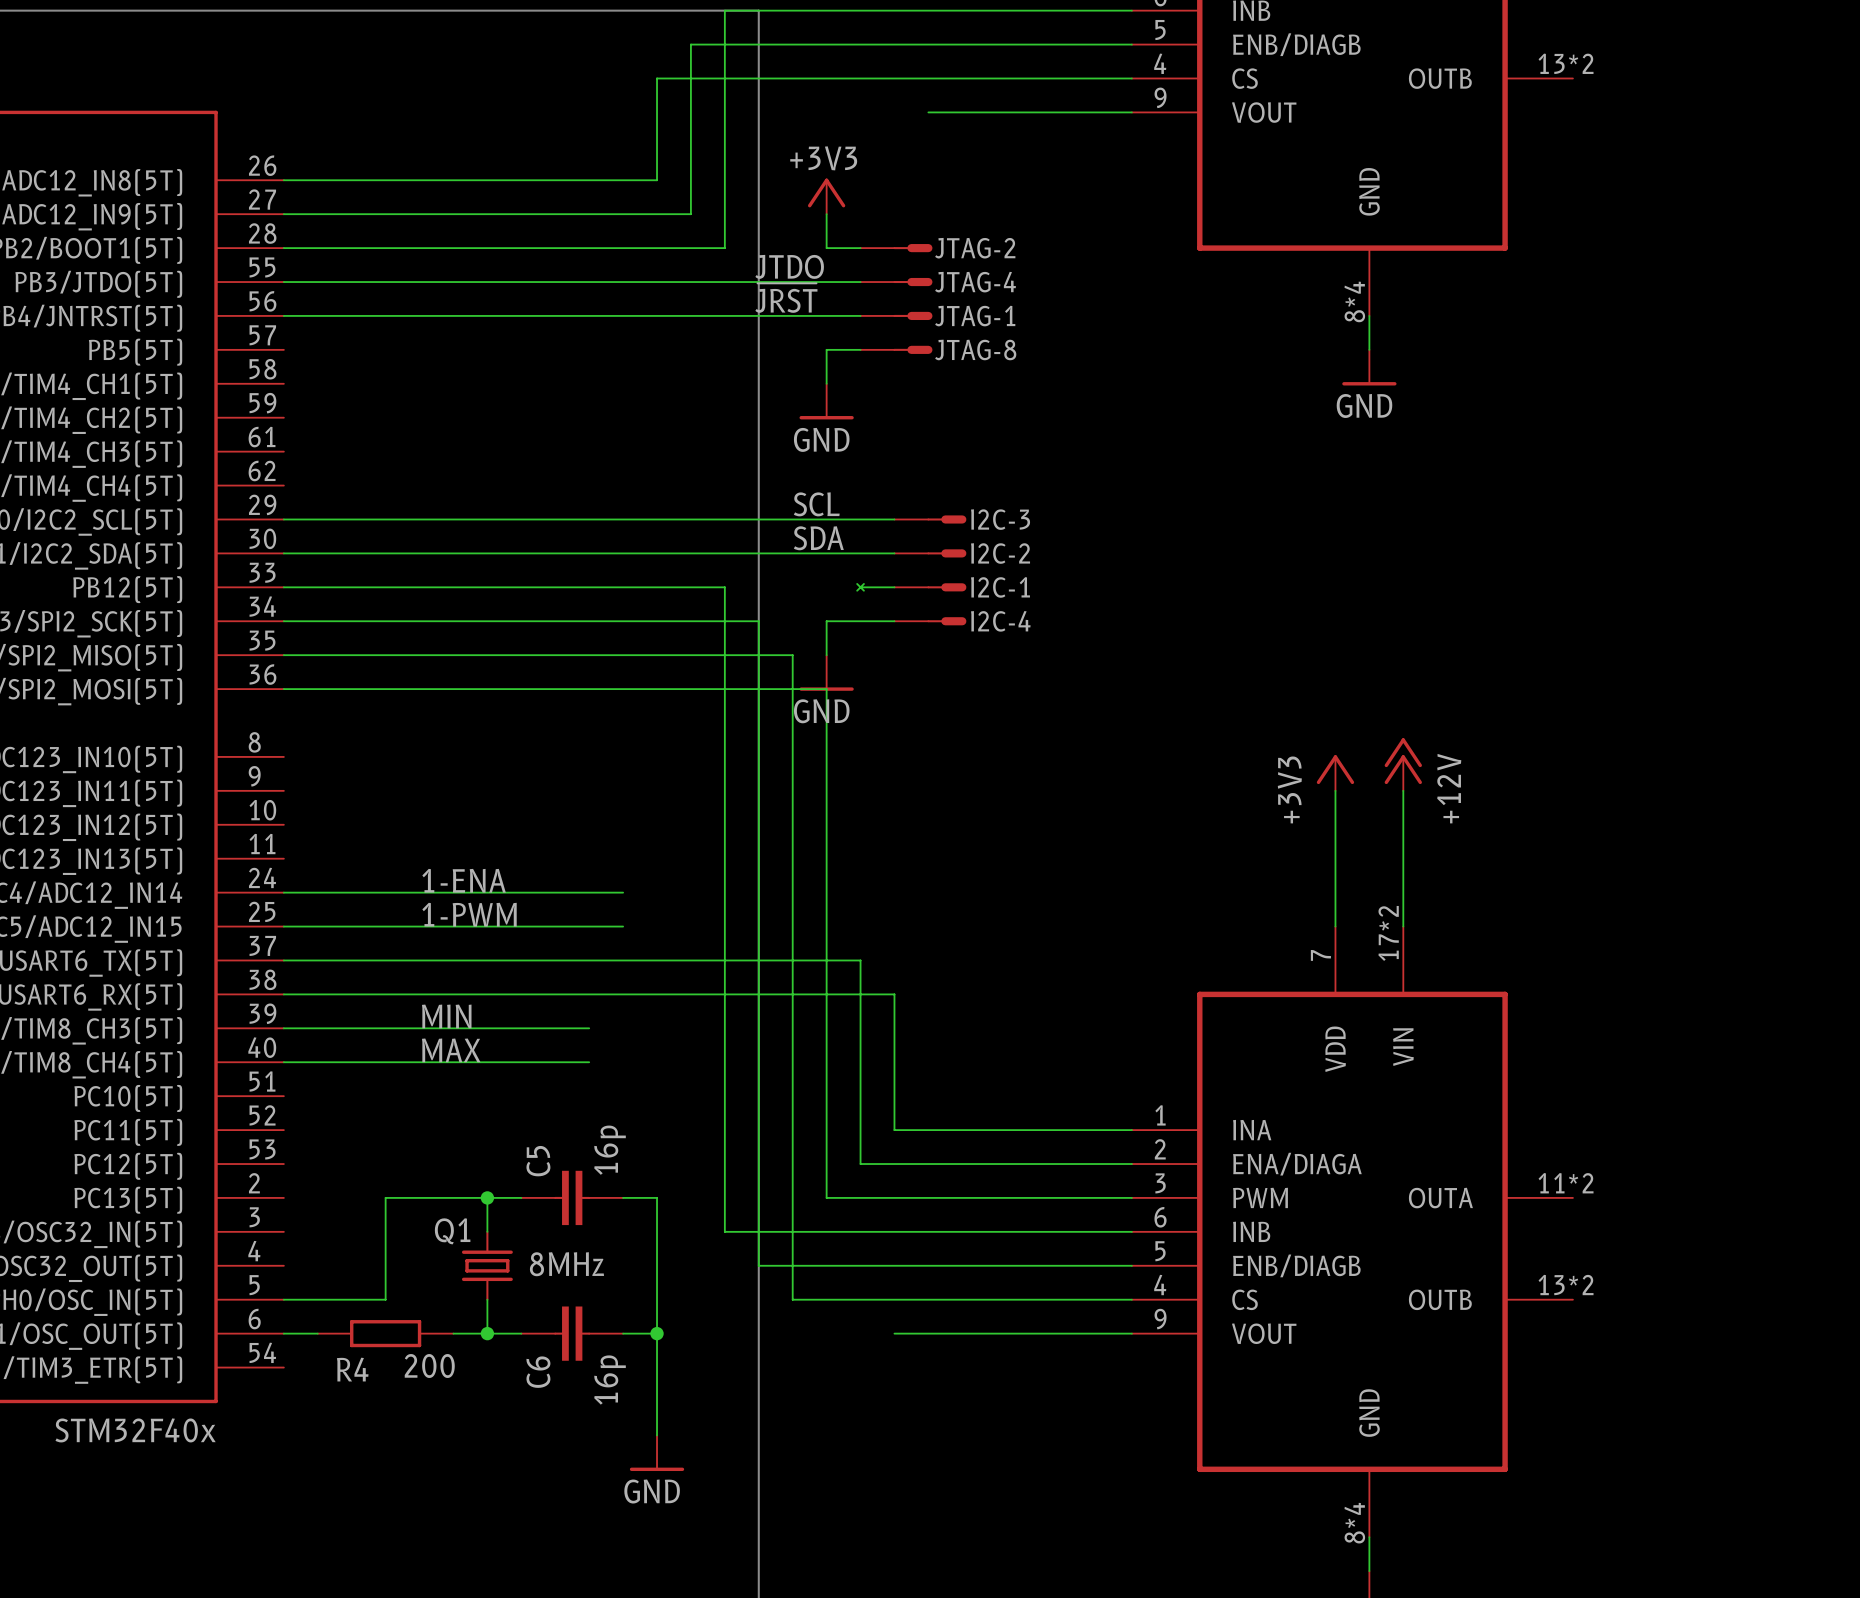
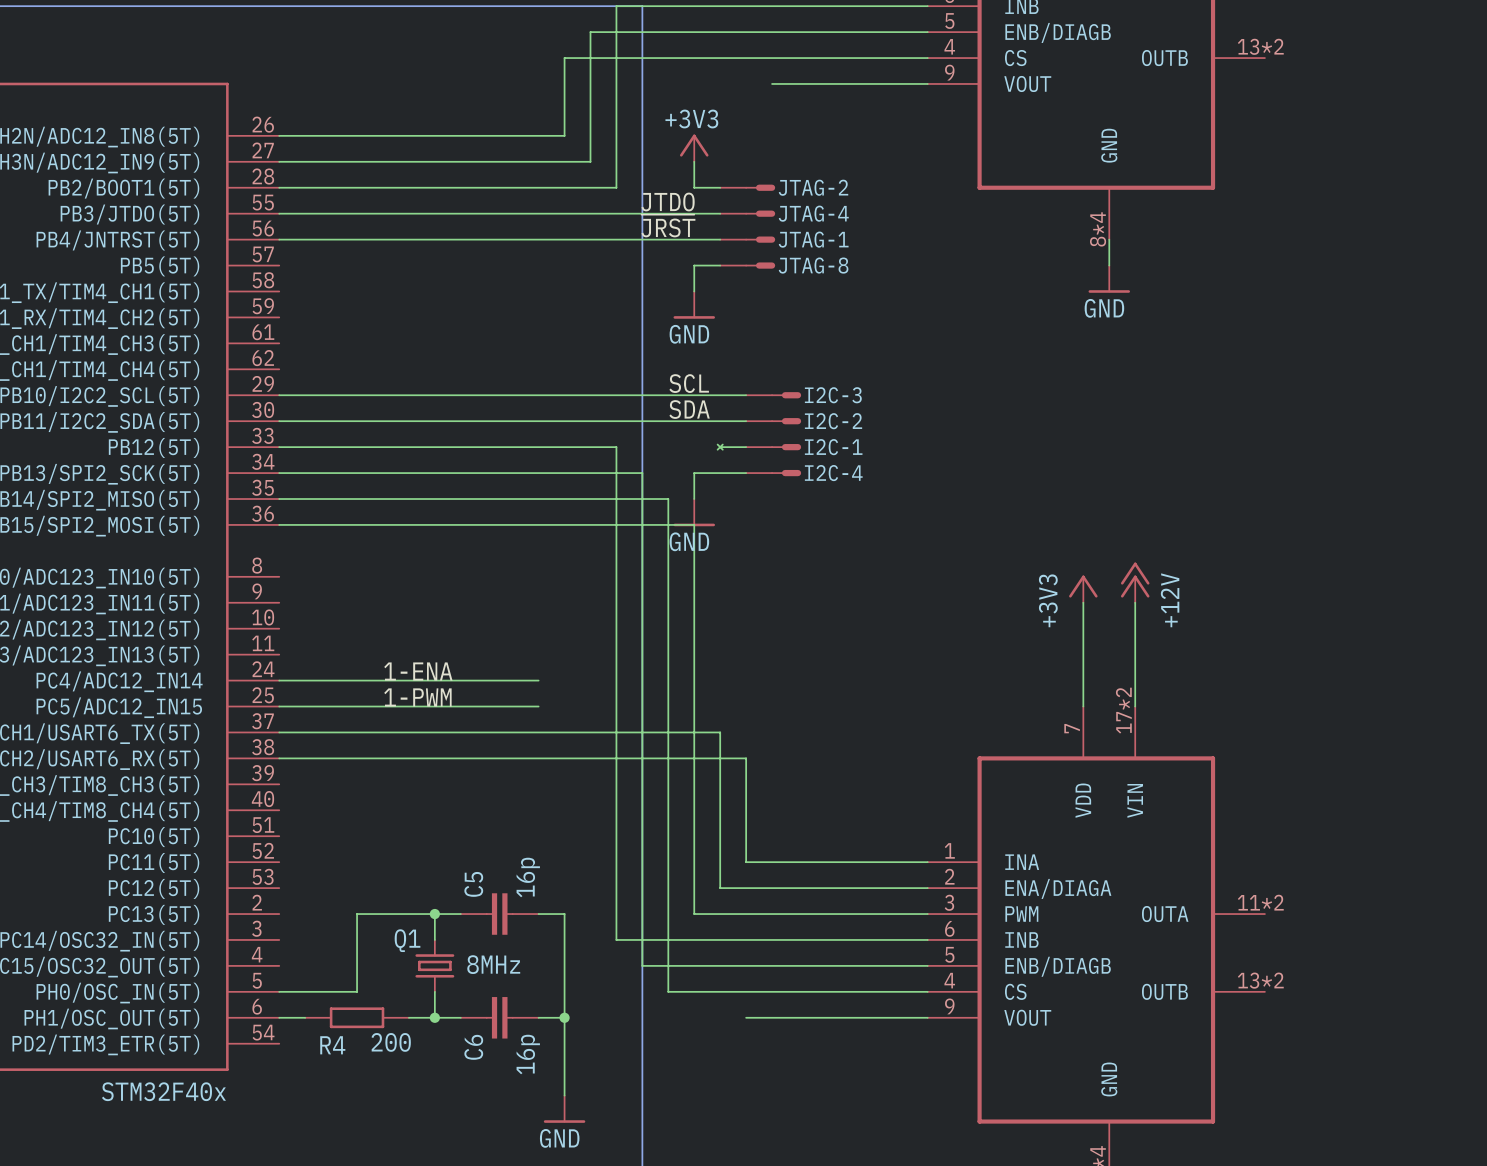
label: MIN (446, 1016) -> none
wire: (283, 1028) (589, 1028) -> none
label: MAX (451, 1050) -> none
wire: (283, 1062) (589, 1062) -> none

